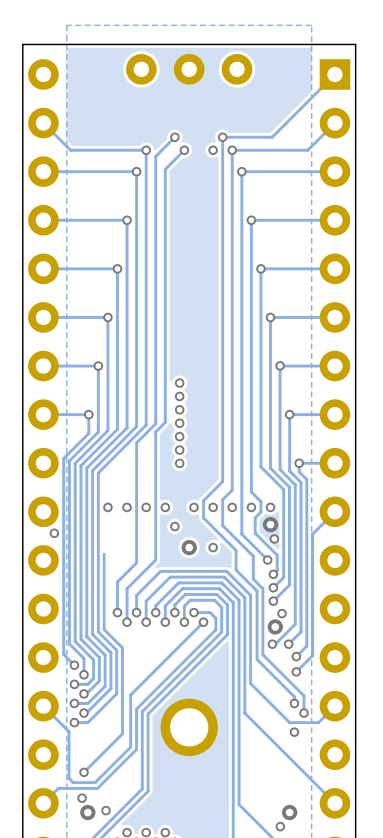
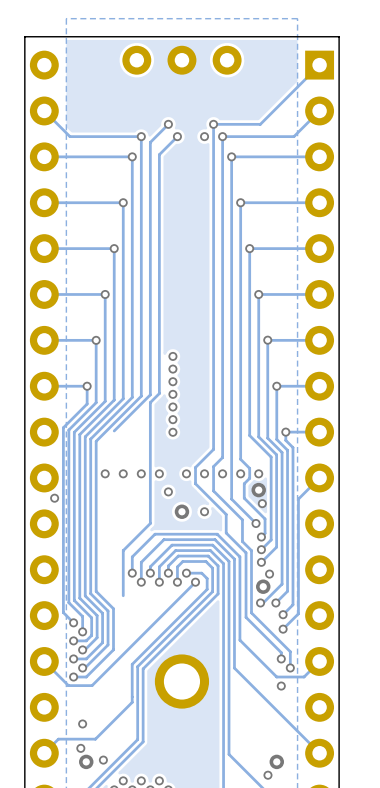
track: (136, 442) (136, 562) (117, 582) (117, 612) -> (132, 412) (114, 430)
track: (104, 554) (104, 629) (122, 647) (122, 733) (84, 772) -> none
via: (117, 612) -> none
track: none -> (123, 582) (123, 595)
via: (127, 622) -> none
track: (130, 695) (130, 747) (95, 782) (73, 782) (69, 778) (69, 731) -> (126, 650) (92, 685) (68, 685)

